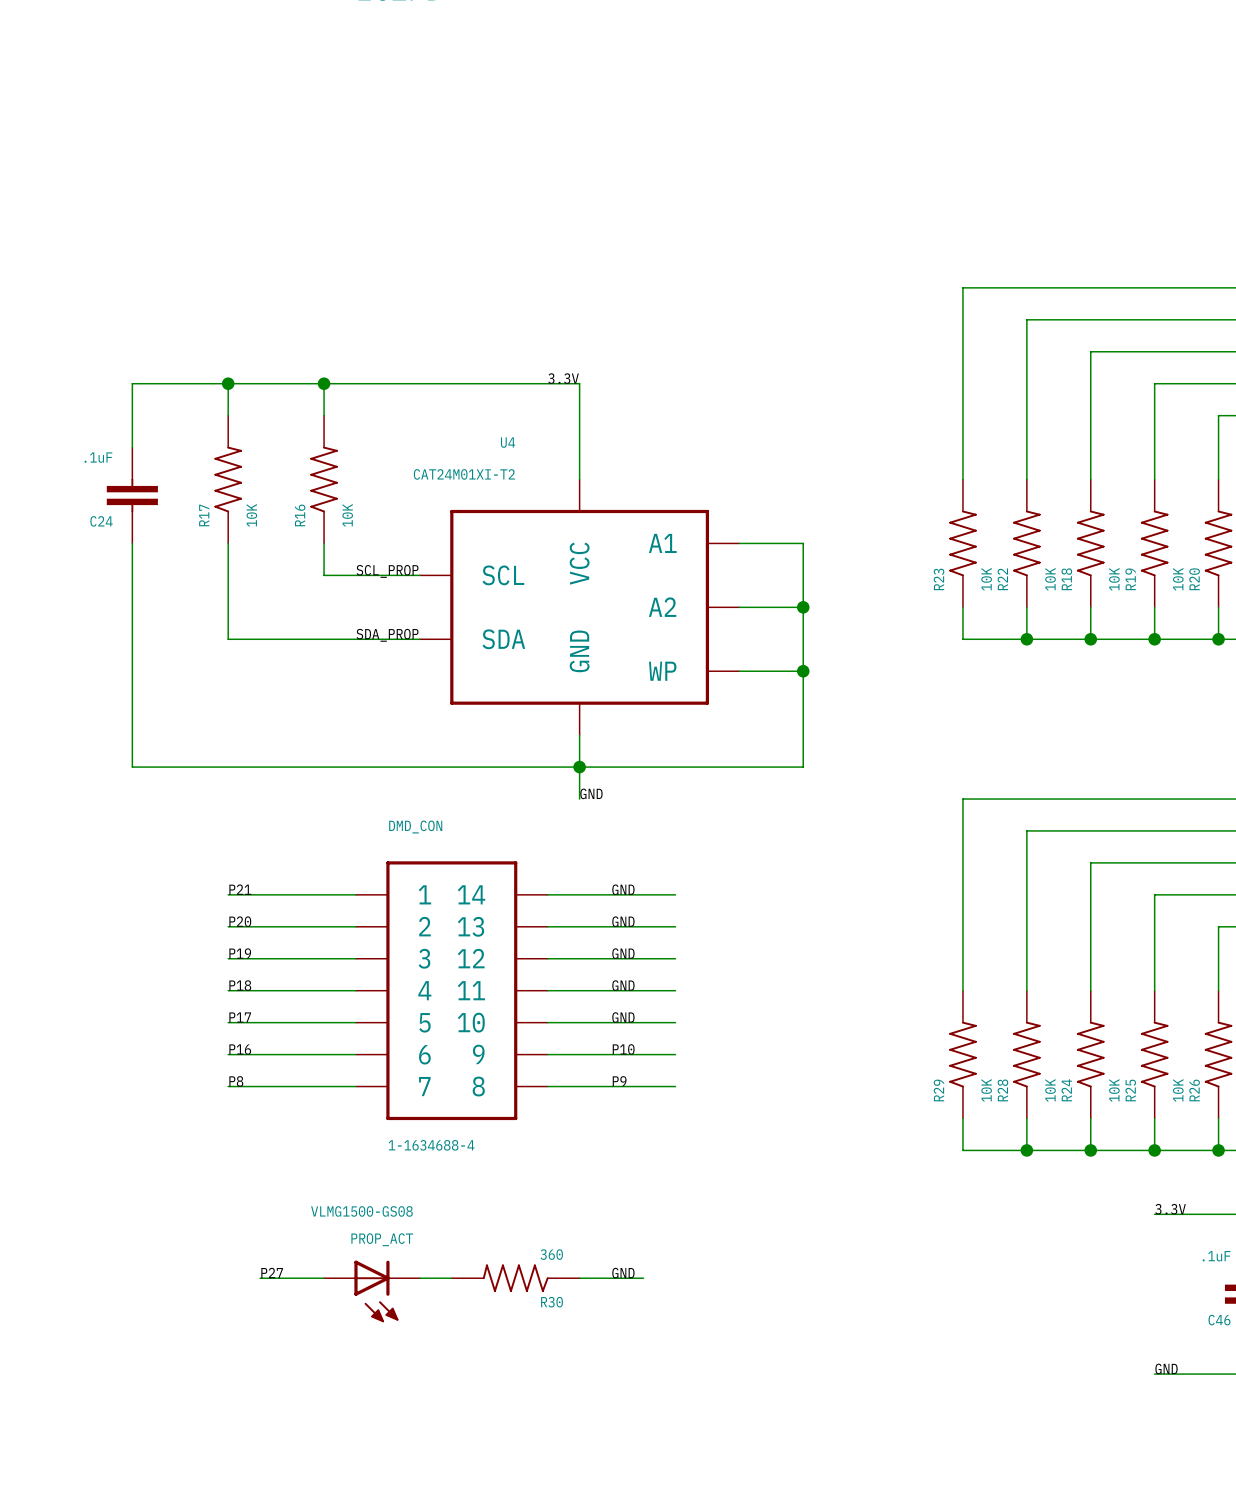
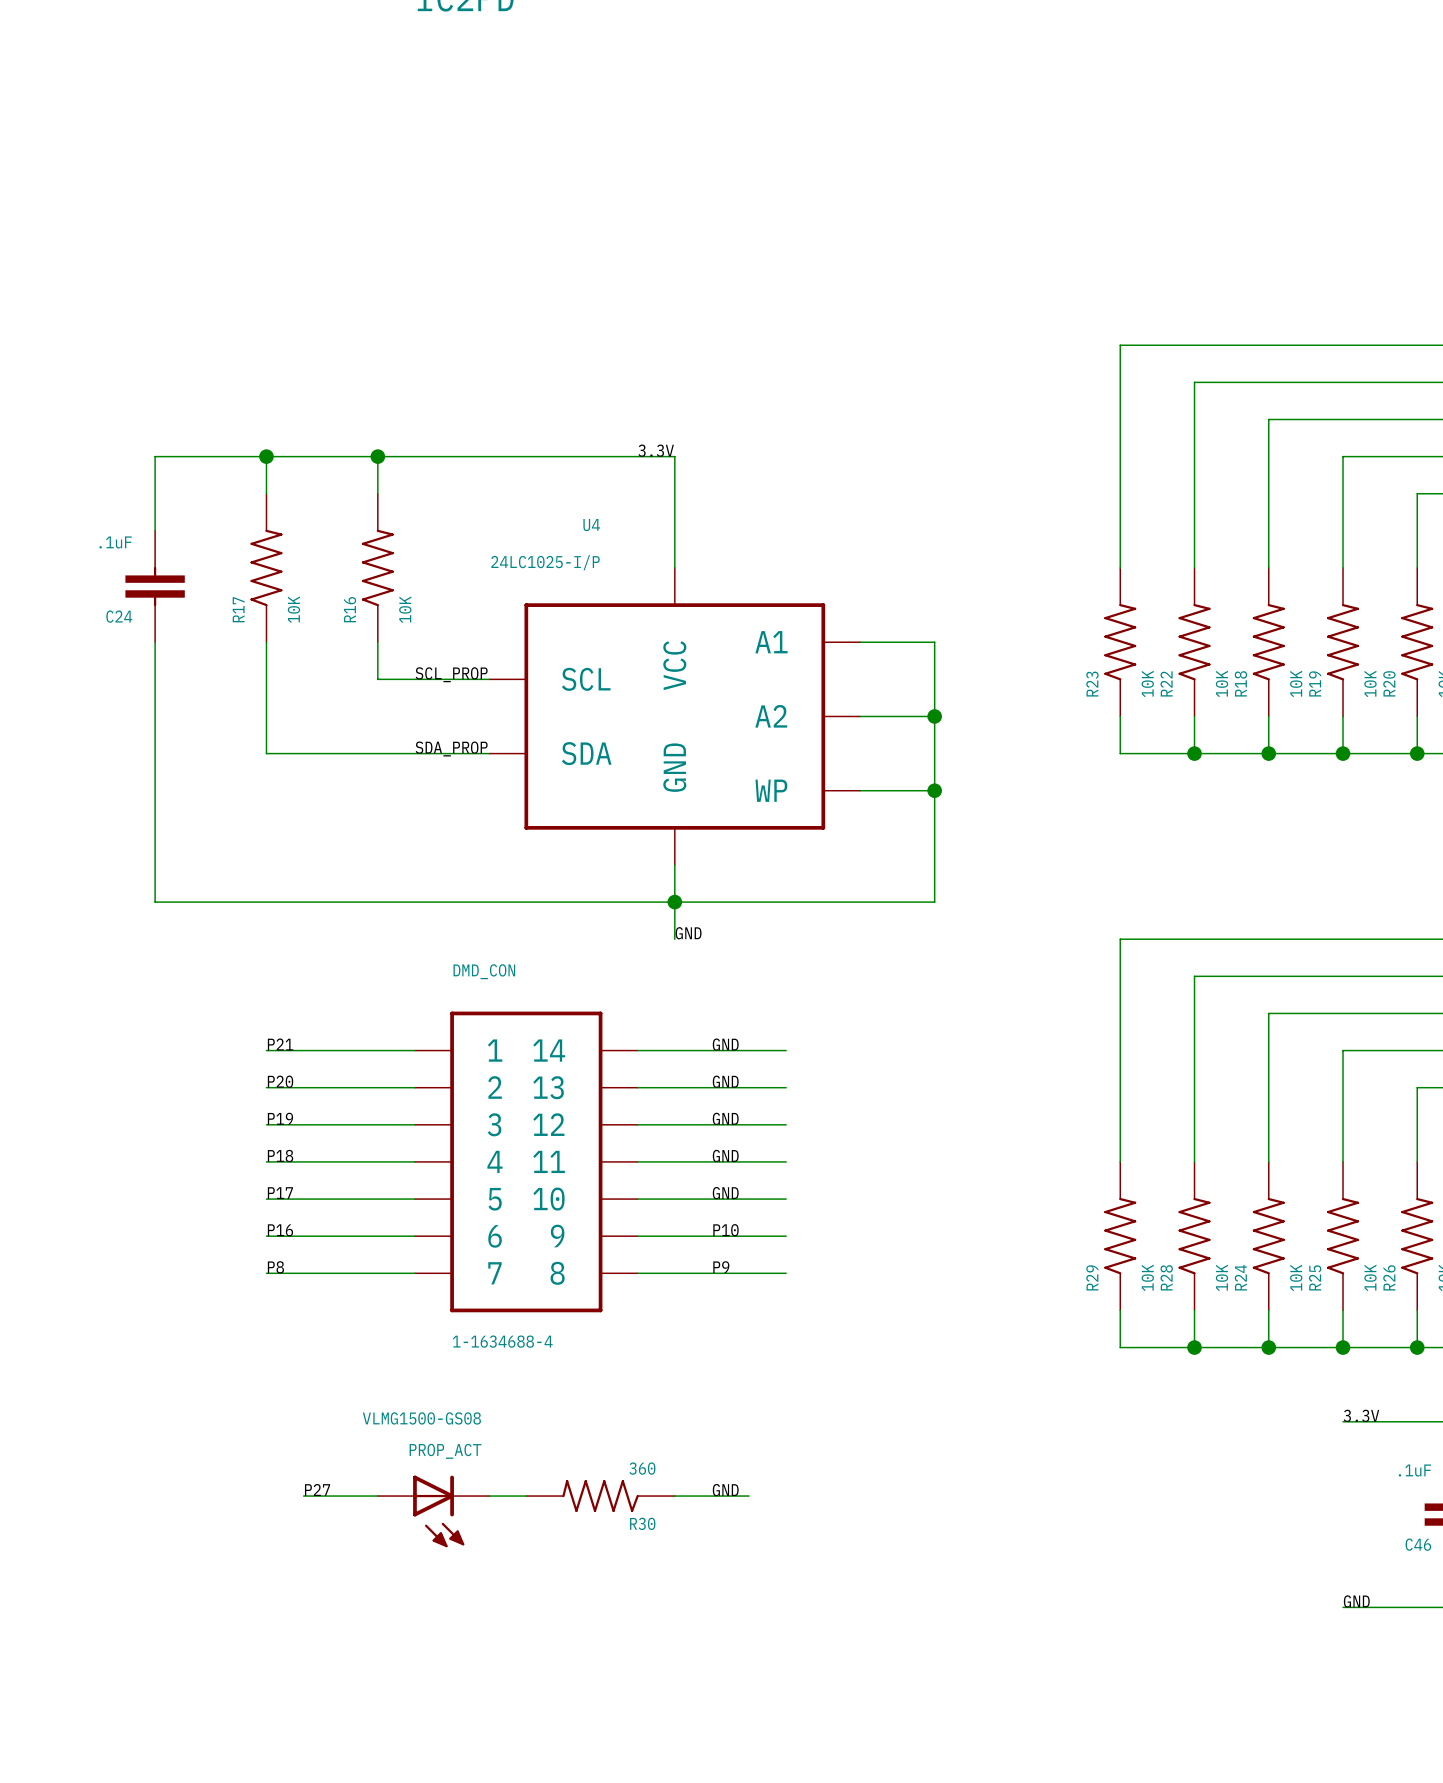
U4 value: CAT24M01XI-T2 (464, 474) -> 24LC1025-I/P (545, 562)

